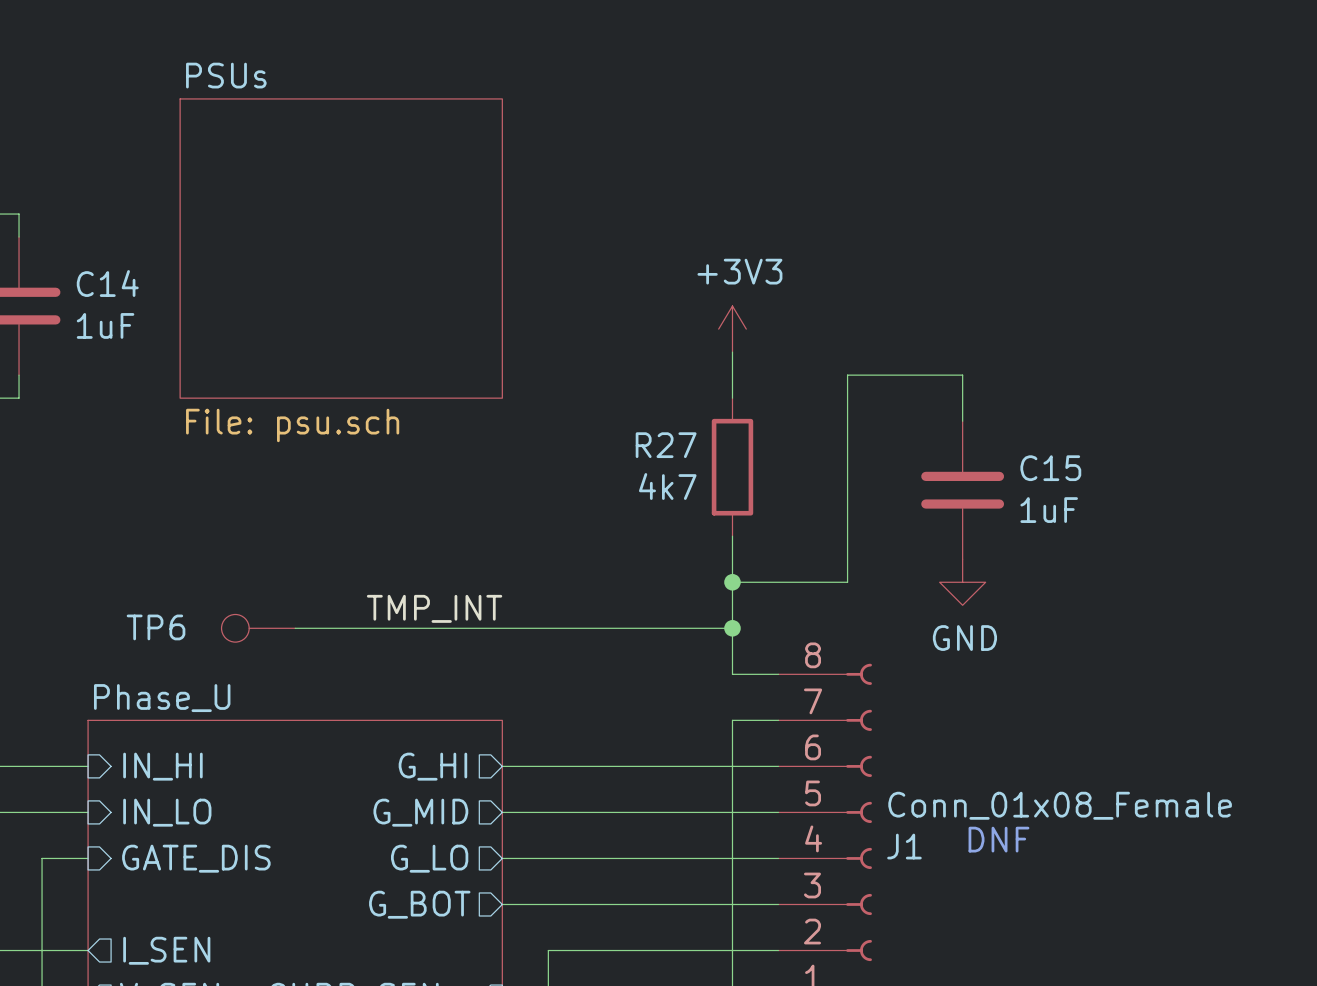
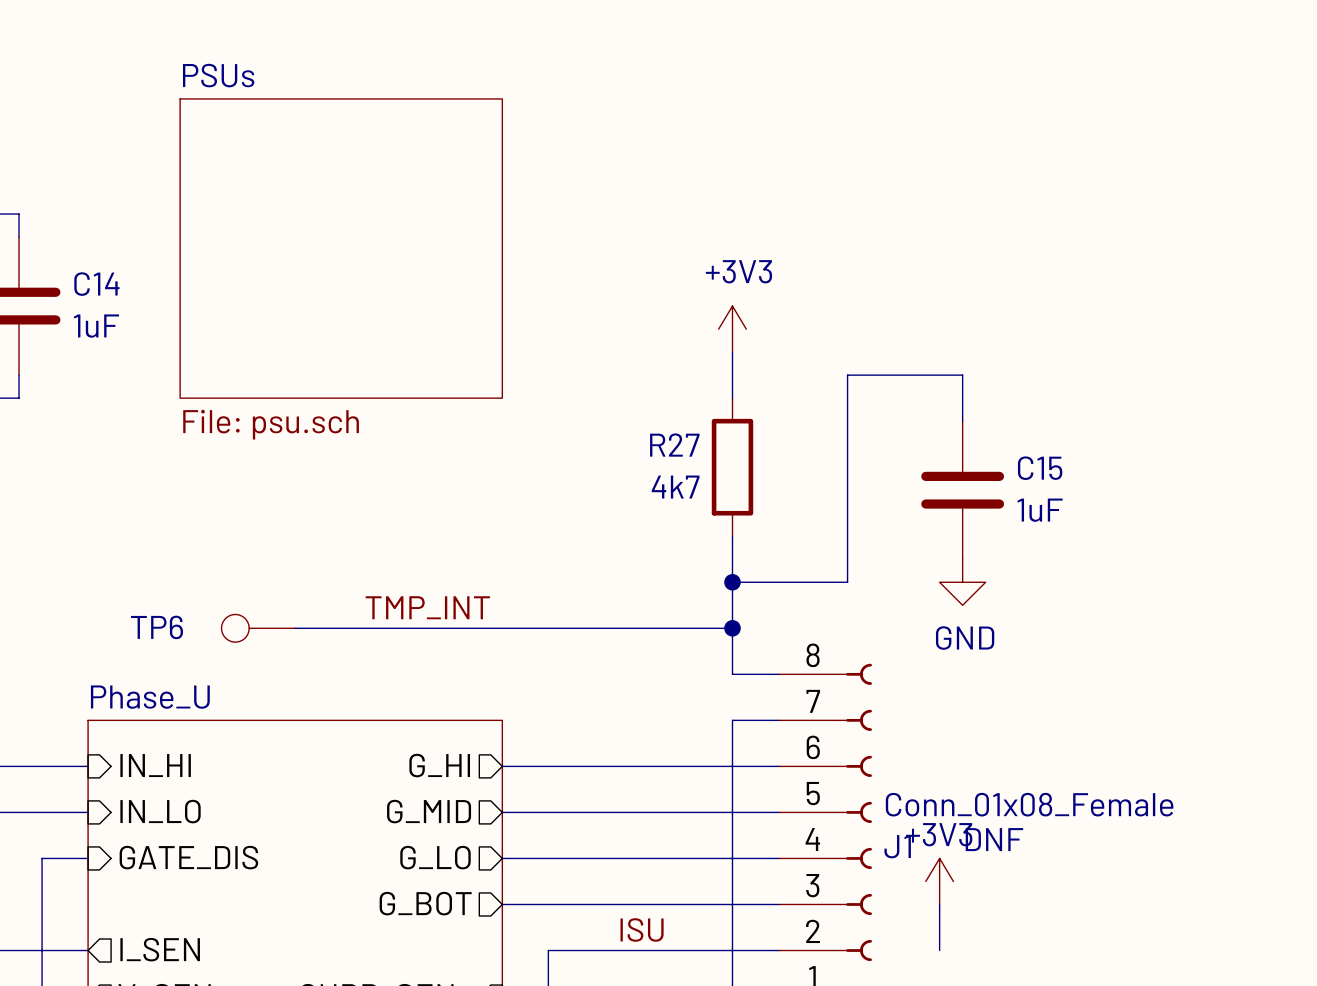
power symbol: none -> +3V3 (939, 881)
wire: none -> (939, 904) (939, 950)
label: none -> ISU (642, 929)

